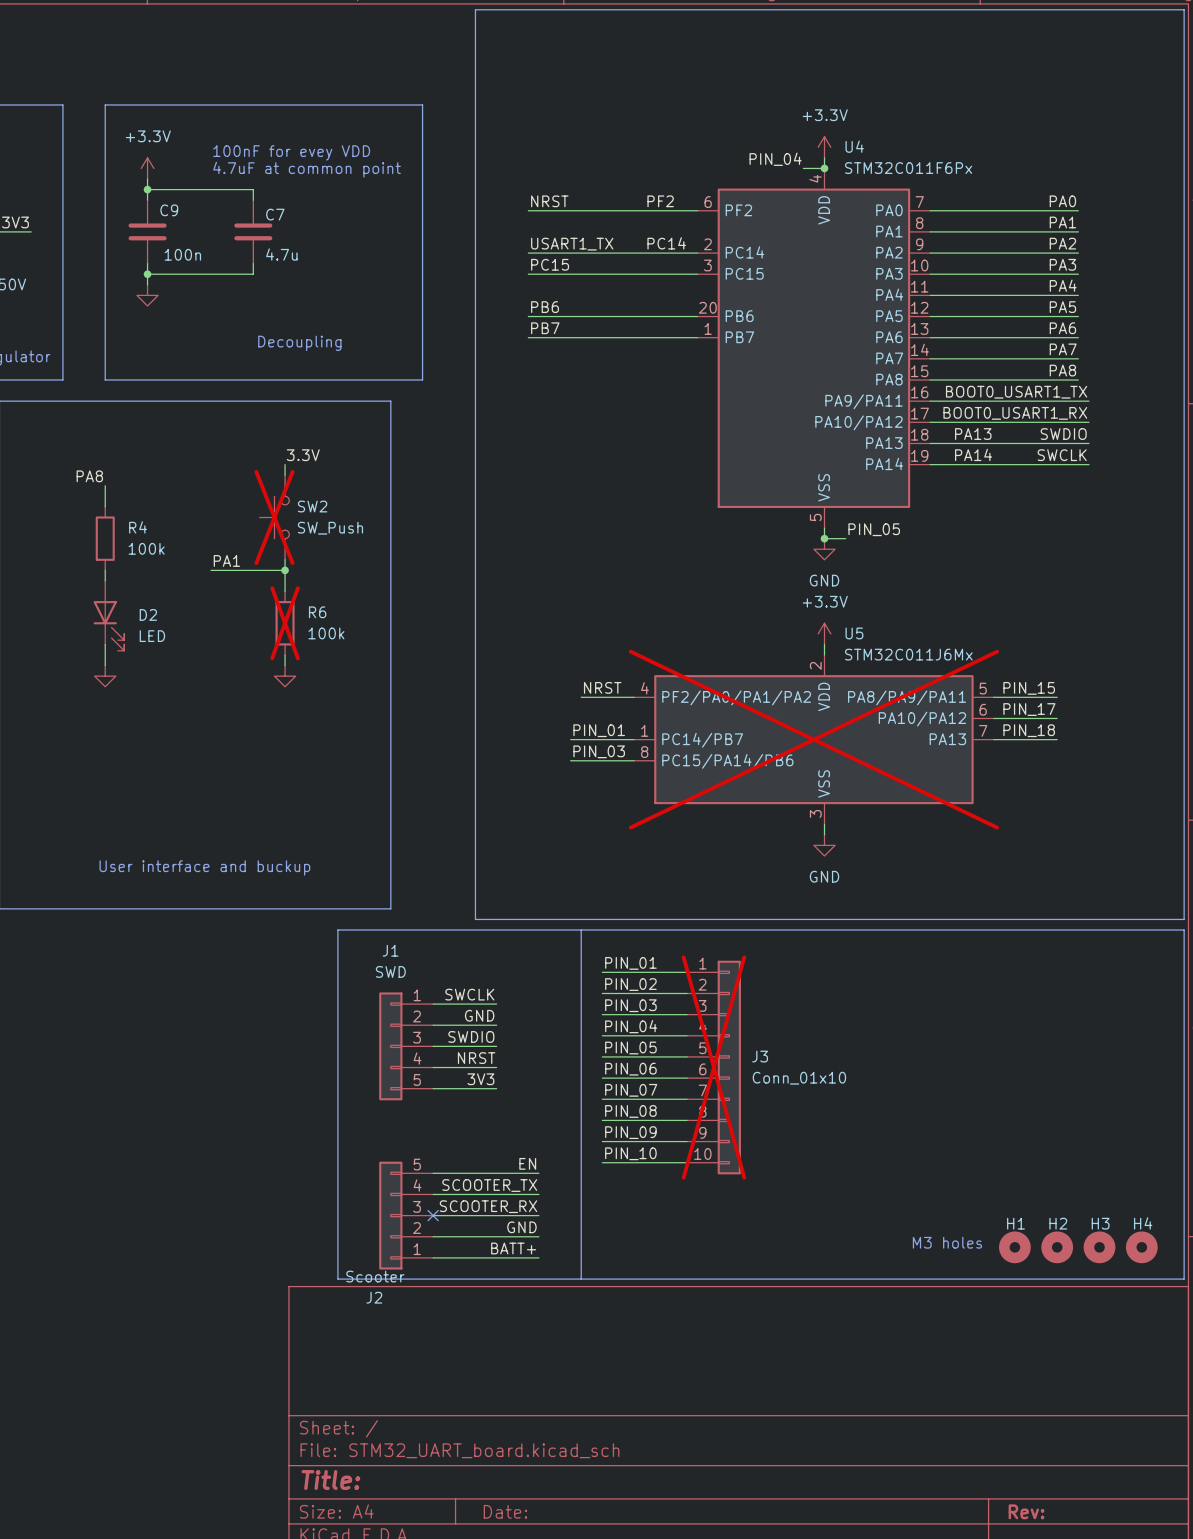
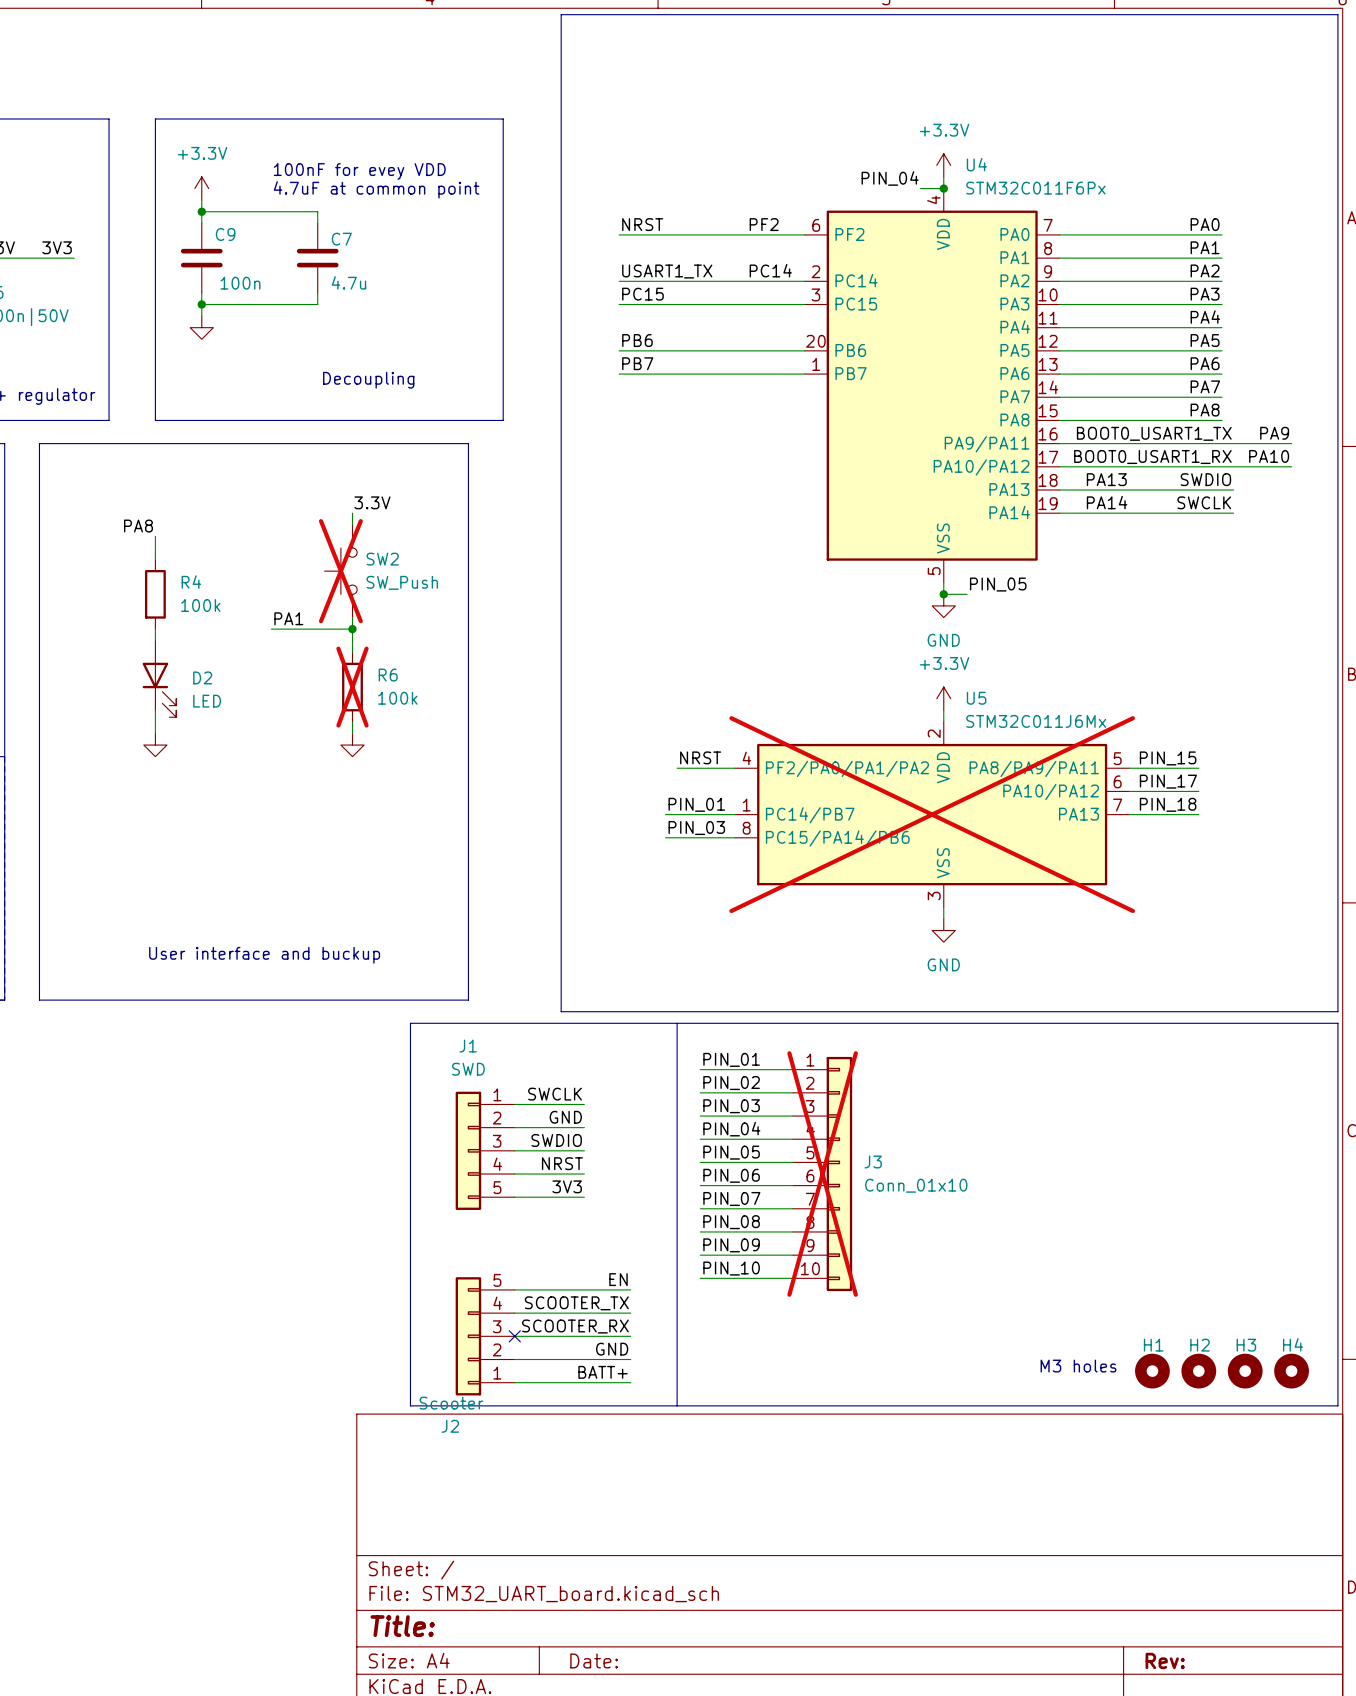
label: none -> PA9 (1274, 433)
wire: none -> (1233, 443) (1291, 443)
label: none -> PA10 (1269, 456)
wire: none -> (1233, 466) (1291, 466)

